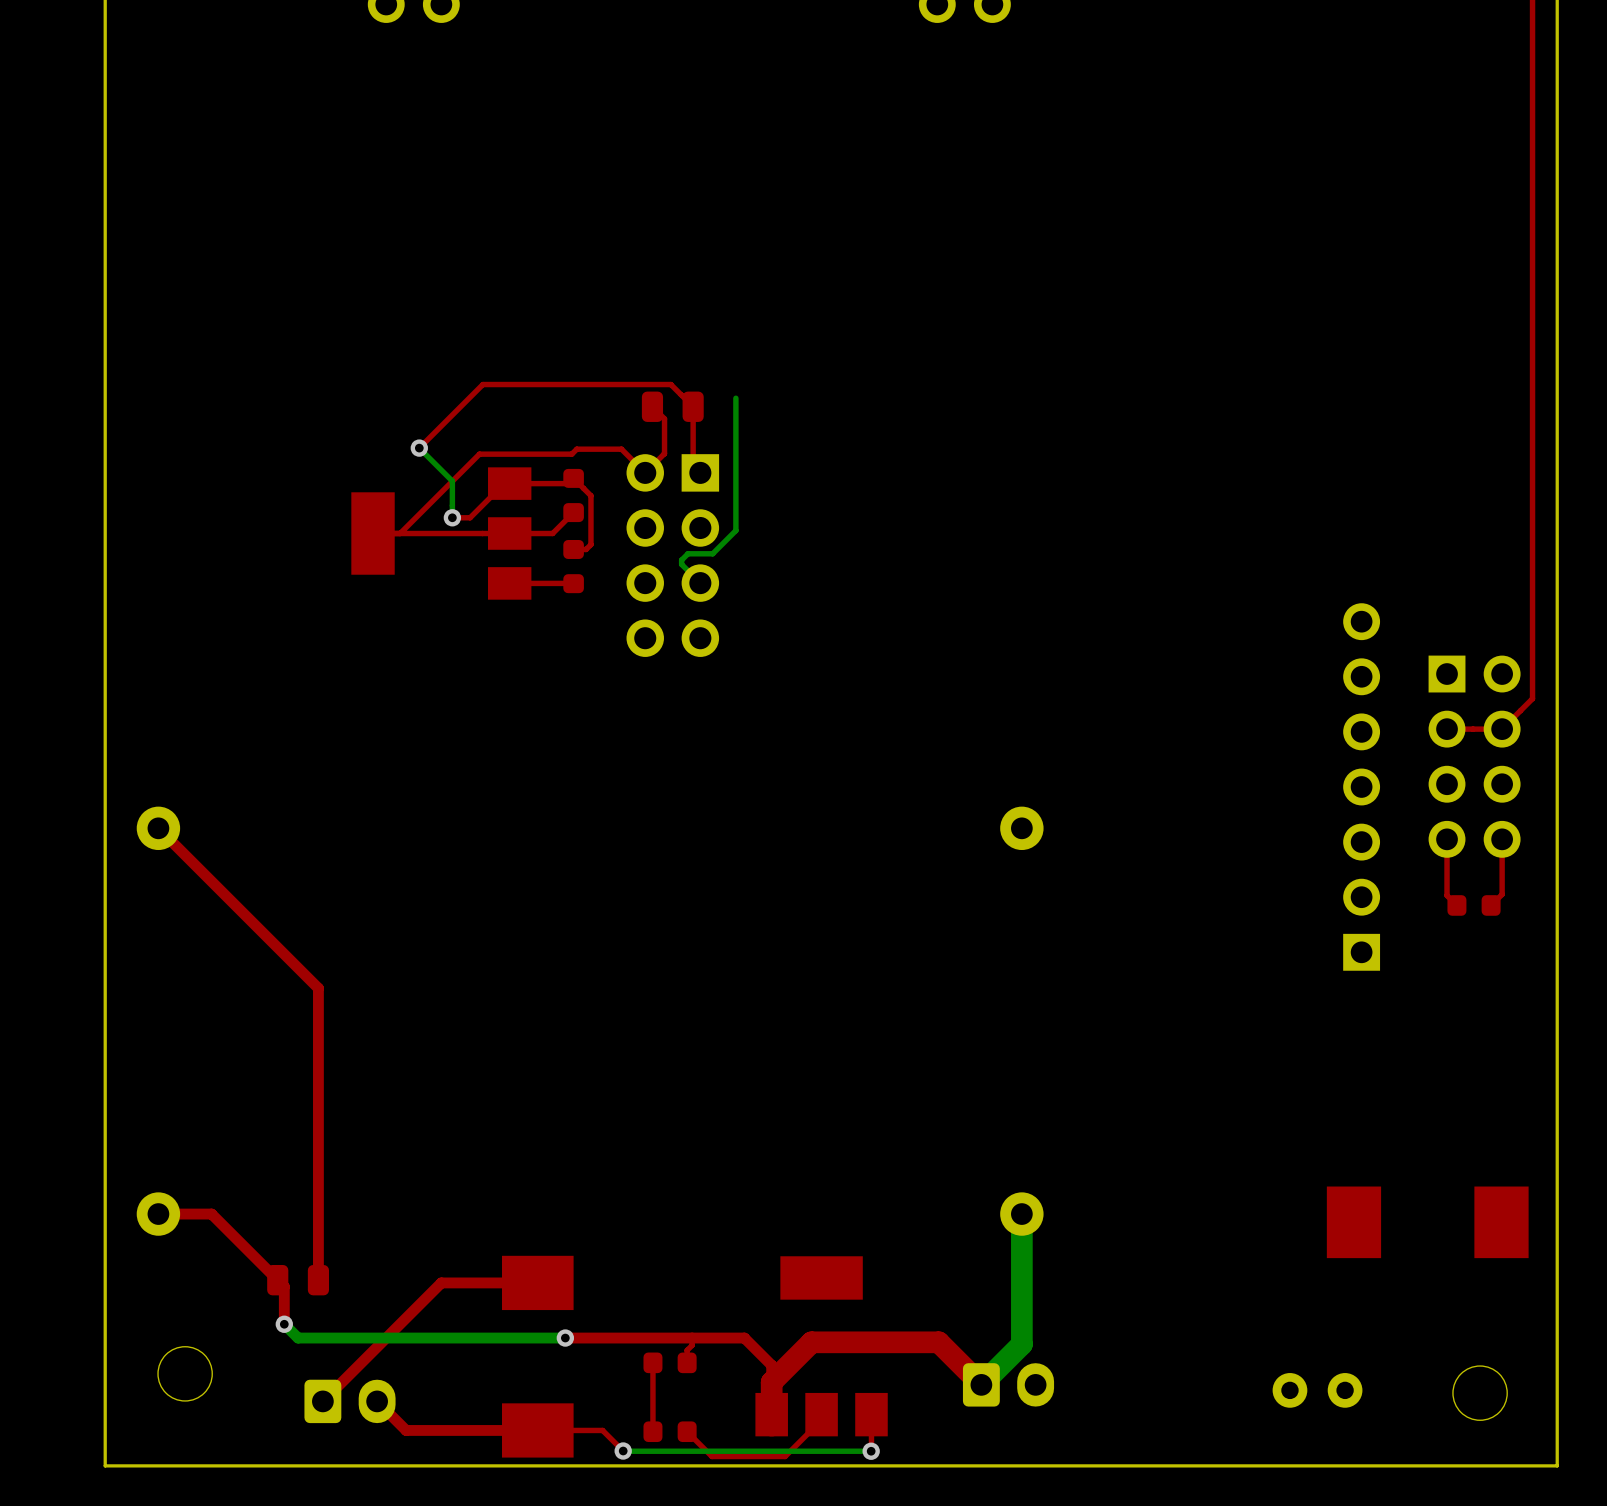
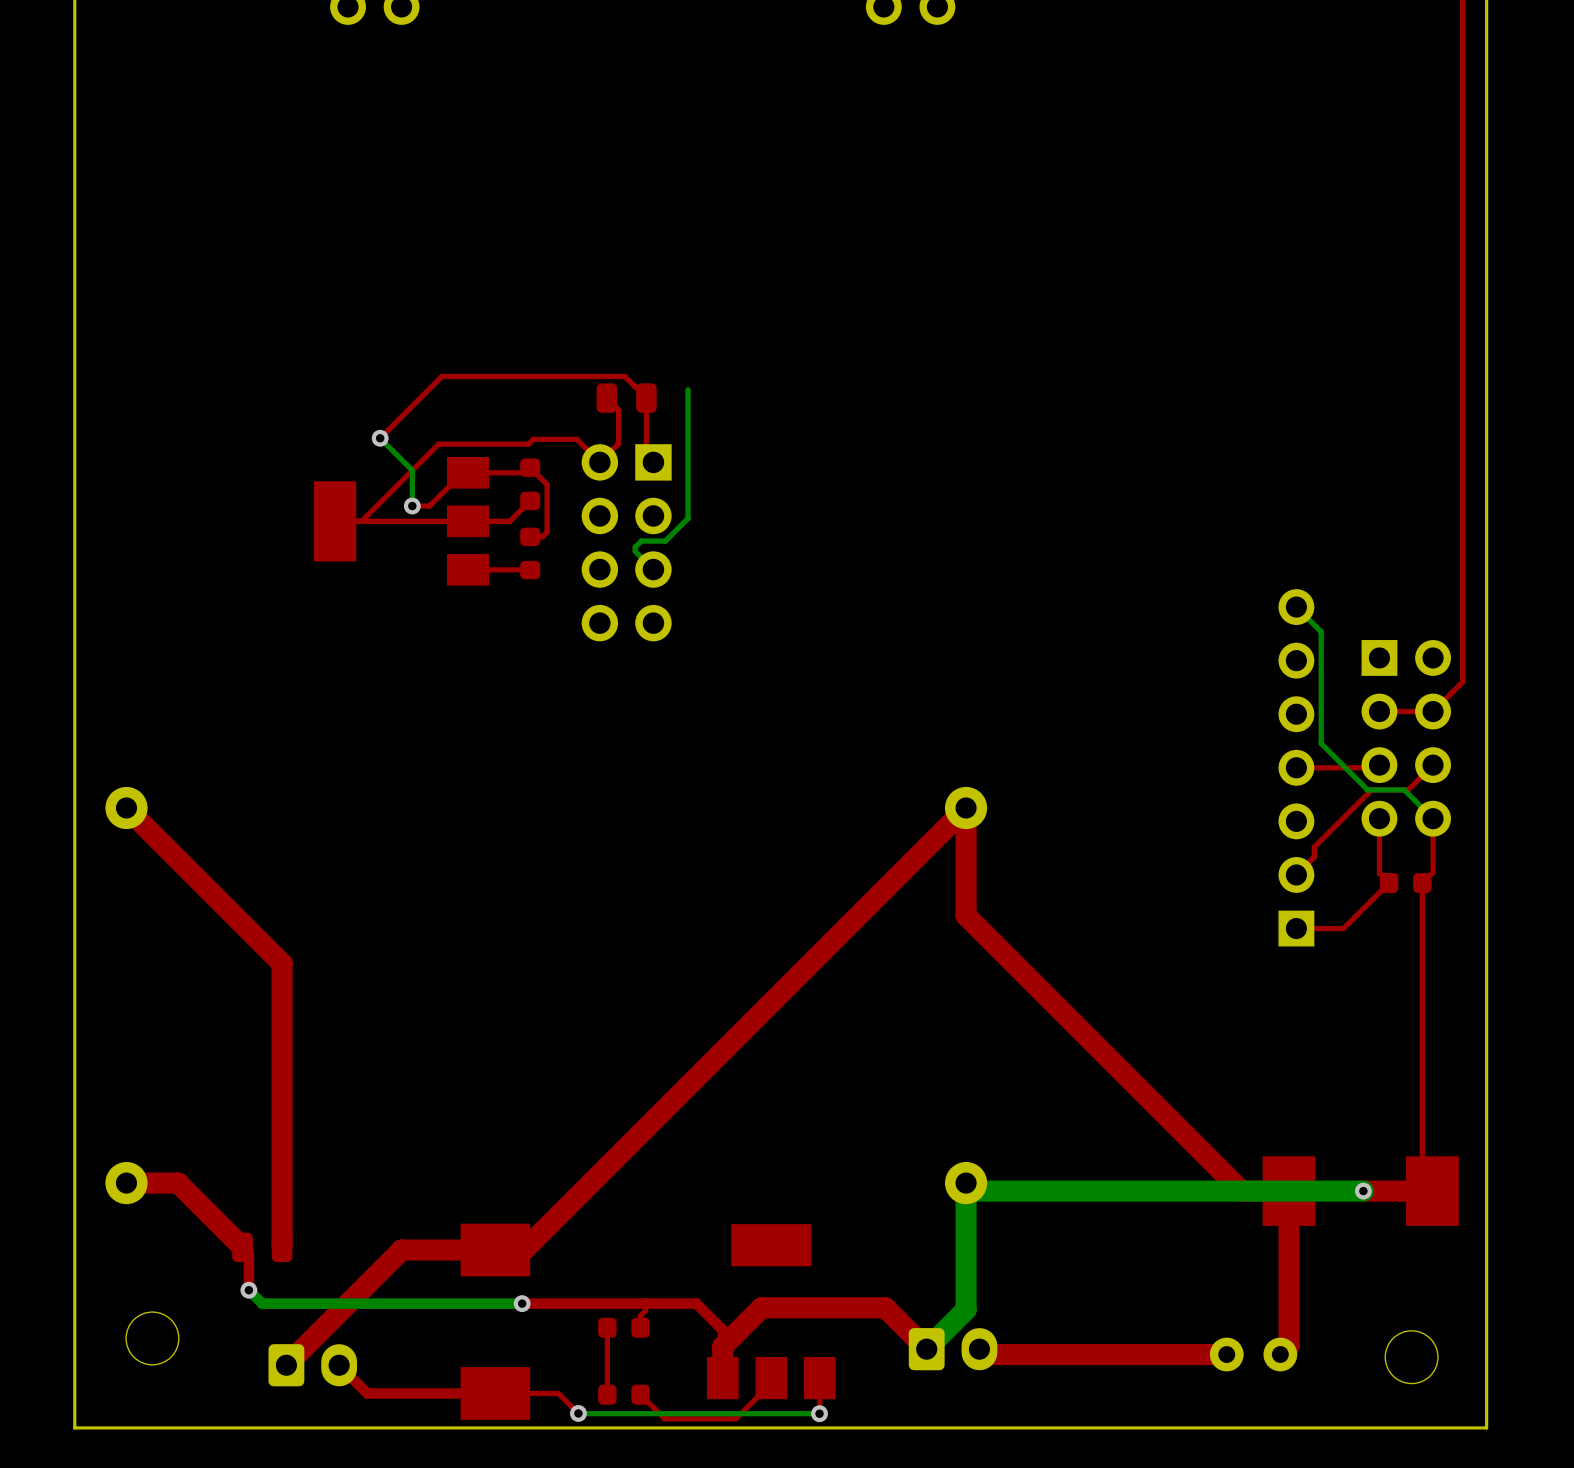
bottom track: none -> (1296, 607) (1321, 631) (1321, 743) (1367, 789) (1404, 789) (1433, 818)
top track: none -> (1379, 765) (1376, 767) (1296, 767)
top track: none -> (1433, 765) (1408, 789) (1371, 789) (1314, 847) (1314, 857) (1296, 874)
top track width: thin (158, 828) (318, 988) (318, 1280) -> thick (126, 807) (282, 963) (282, 1247)
top track: none -> (1389, 883) (1343, 928) (1296, 928)
top track: none -> (1422, 883) (1422, 1180) (1432, 1191) (1363, 1191)
top track width: thin (158, 1214) (211, 1214) (277, 1280) -> thick (126, 1183) (178, 1183) (242, 1247)
bottom track: none -> (966, 1183) (974, 1191) (1363, 1191)
via: none -> (1363, 1191)
top track: none -> (495, 1250) (524, 1250) (966, 807) (966, 915) (1241, 1191) (1288, 1191) (1288, 1345) (1280, 1354)
top track width: thin (537, 1282) (441, 1282) (322, 1401) -> thick (495, 1250) (401, 1250) (286, 1365)
top track: none -> (979, 1349) (984, 1354) (1226, 1354)

